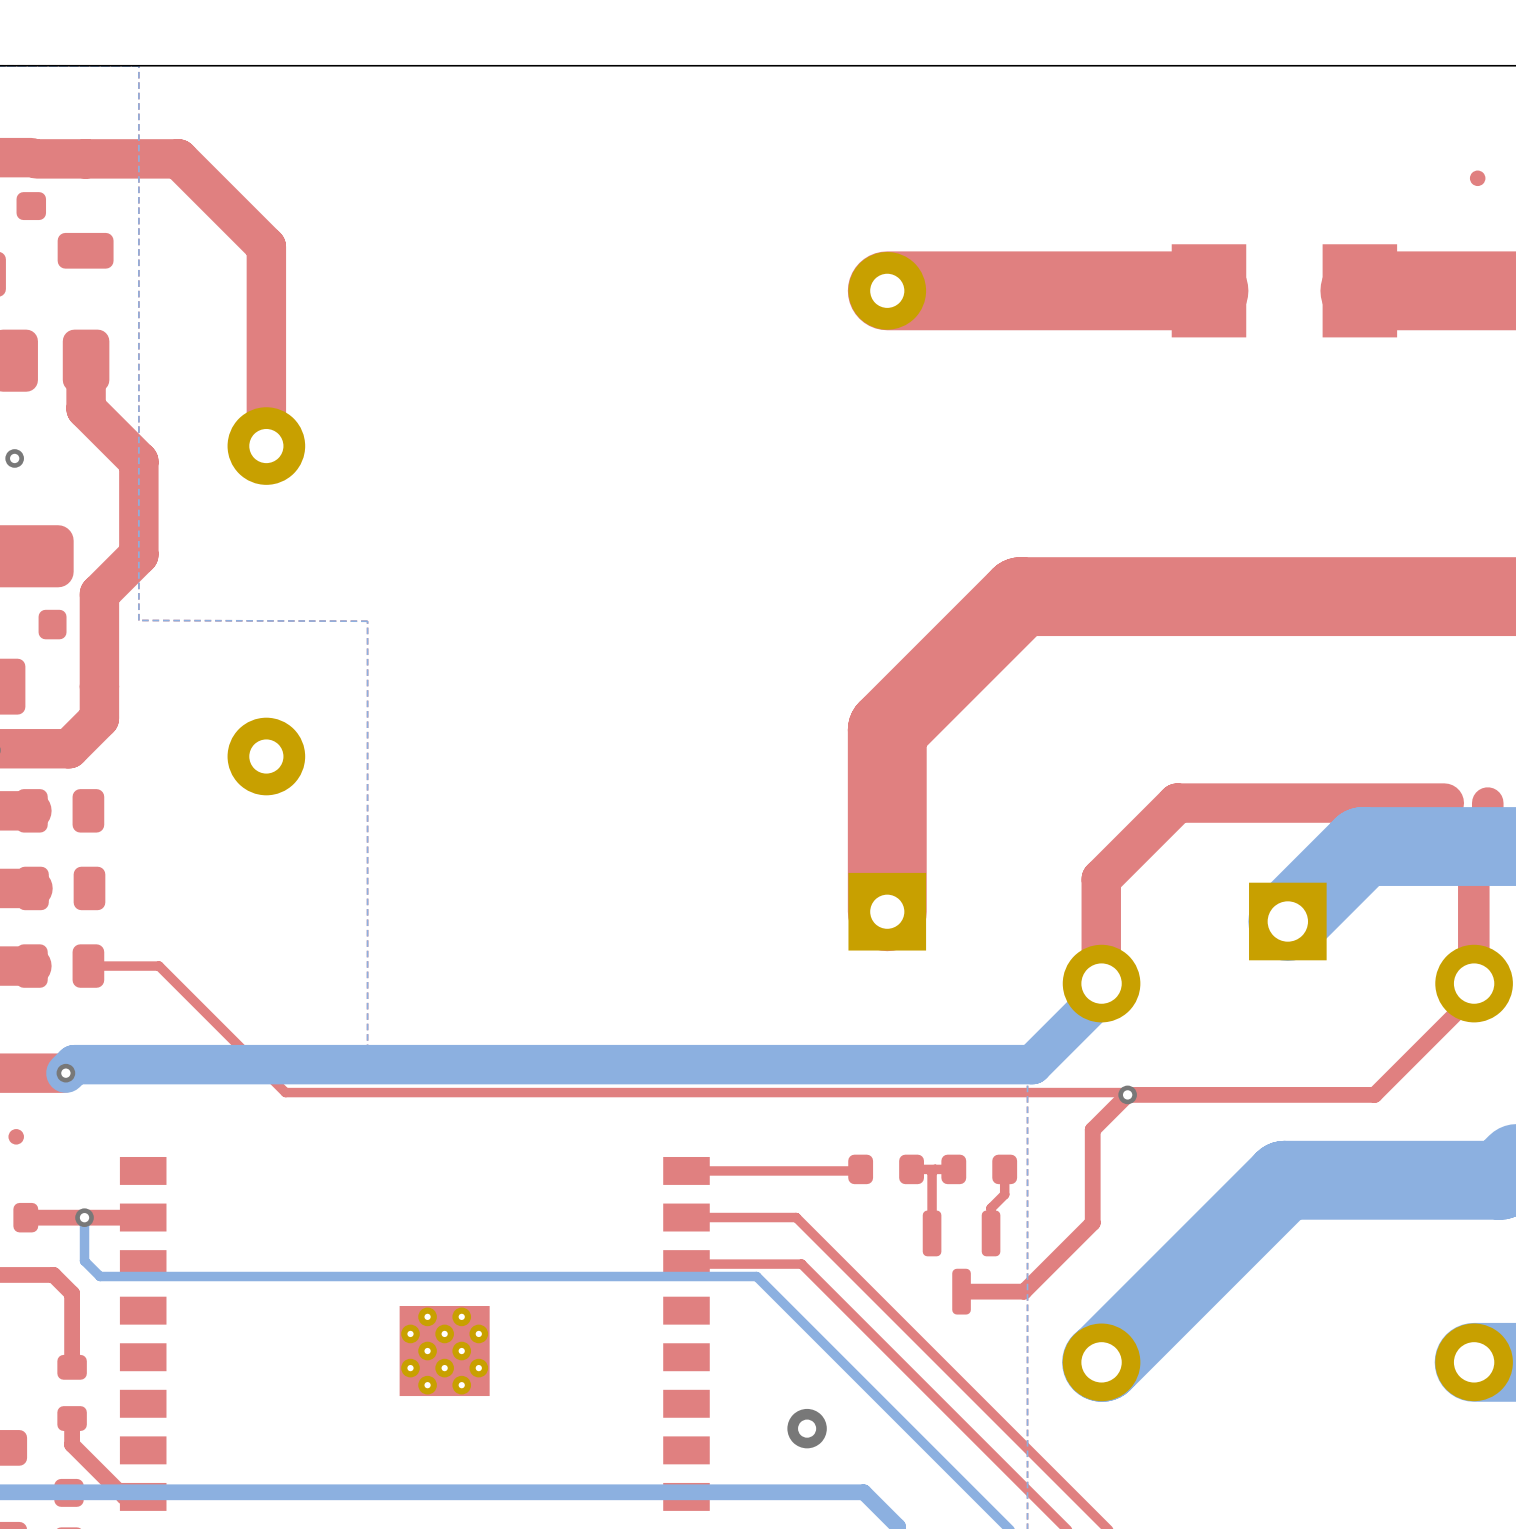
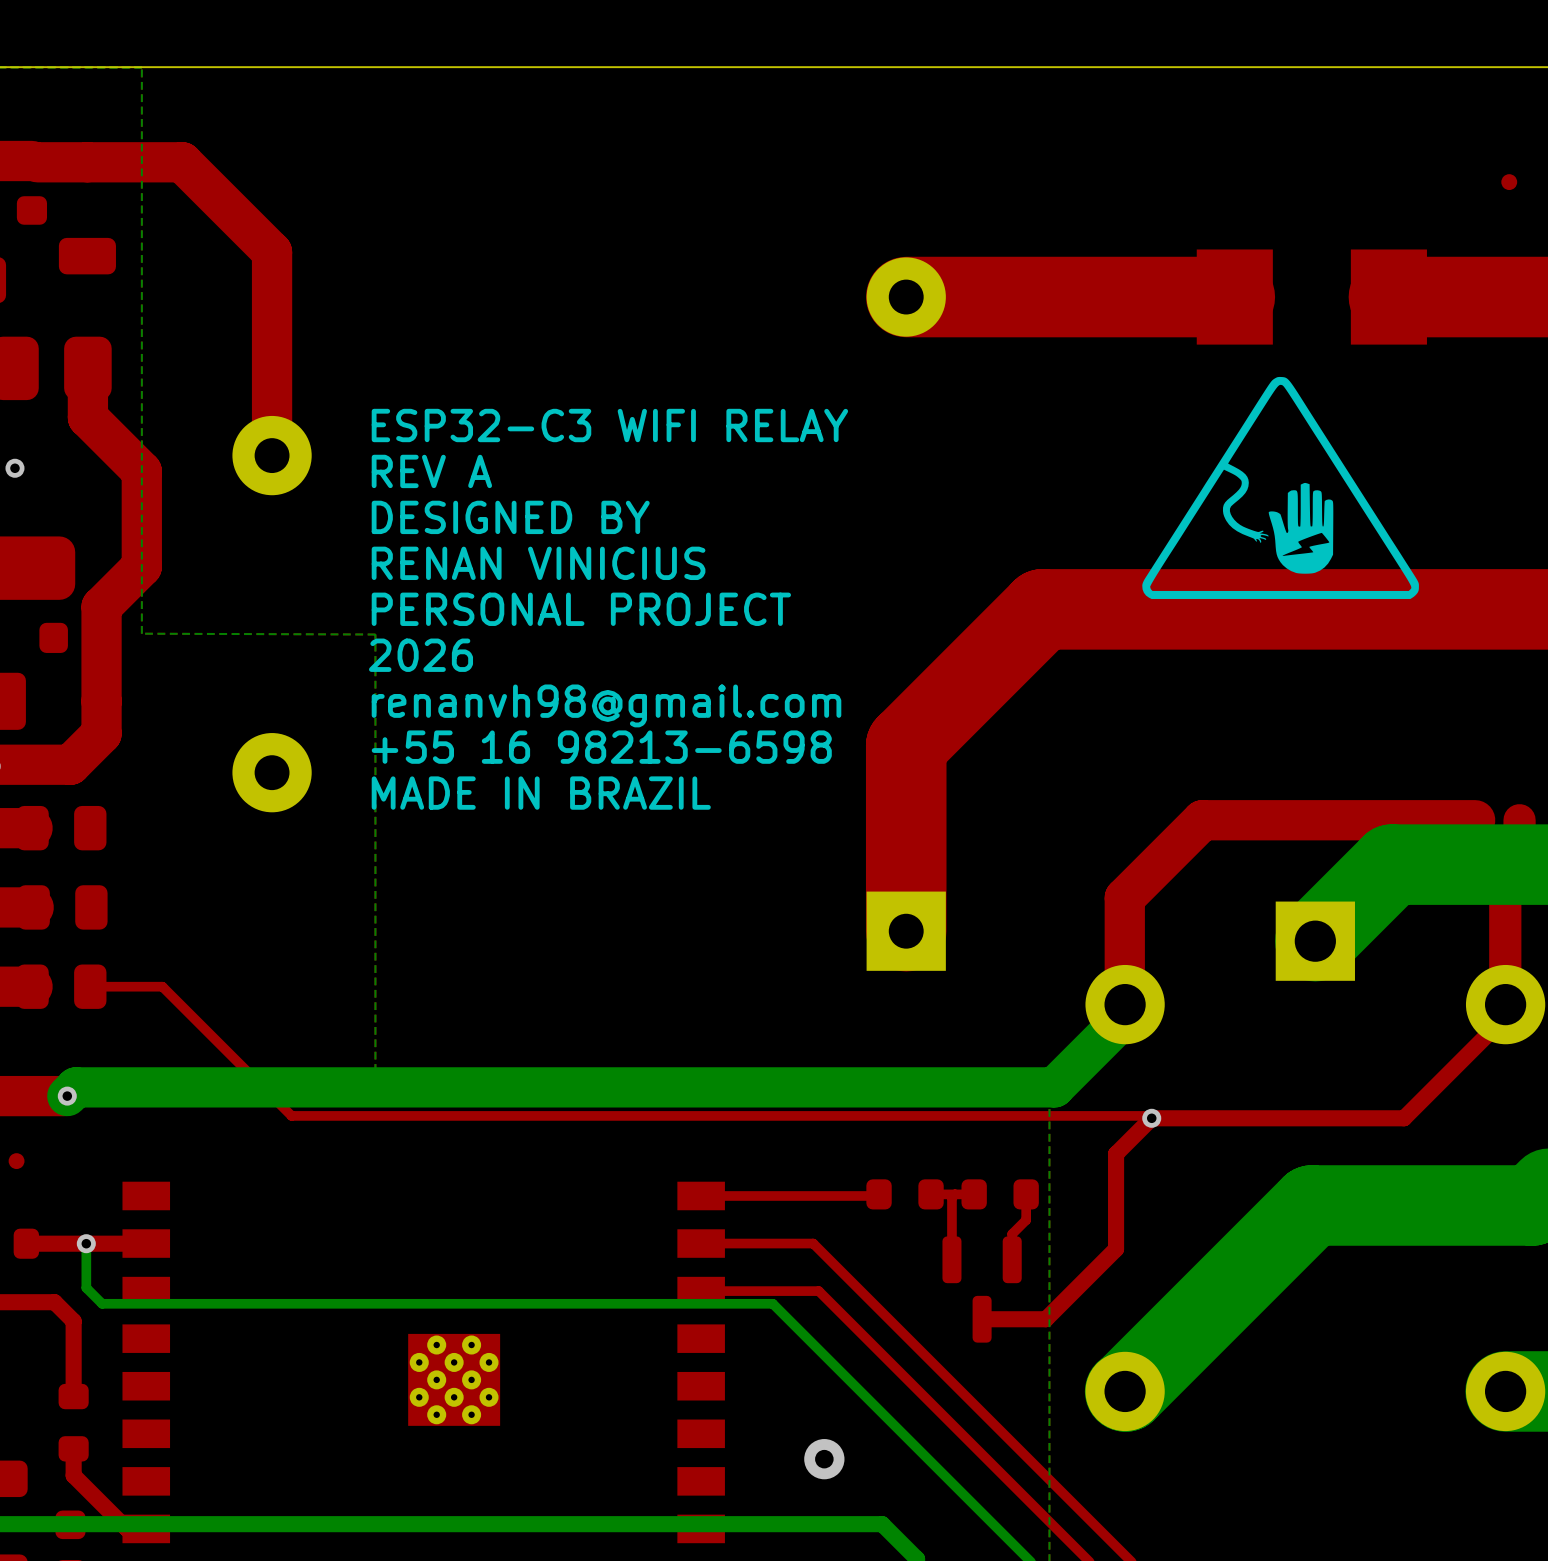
drawing: none -> [1142, 376, 1419, 599]
text: none -> ESP32-C3 WIFI RELAY (609, 425)
text: none -> REV A (431, 471)
text: none -> DESIGNED BY (510, 517)
text: none -> RENAN VINICIUS (538, 563)
text: none -> PERSONAL PROJECT (581, 609)
text: none -> 2026 (421, 655)
text: none -> renanvh98@gmail.com (606, 705)
text: none -> +55 16 98213-6598 (601, 747)
text: none -> MADE IN BRAZIL (541, 793)

